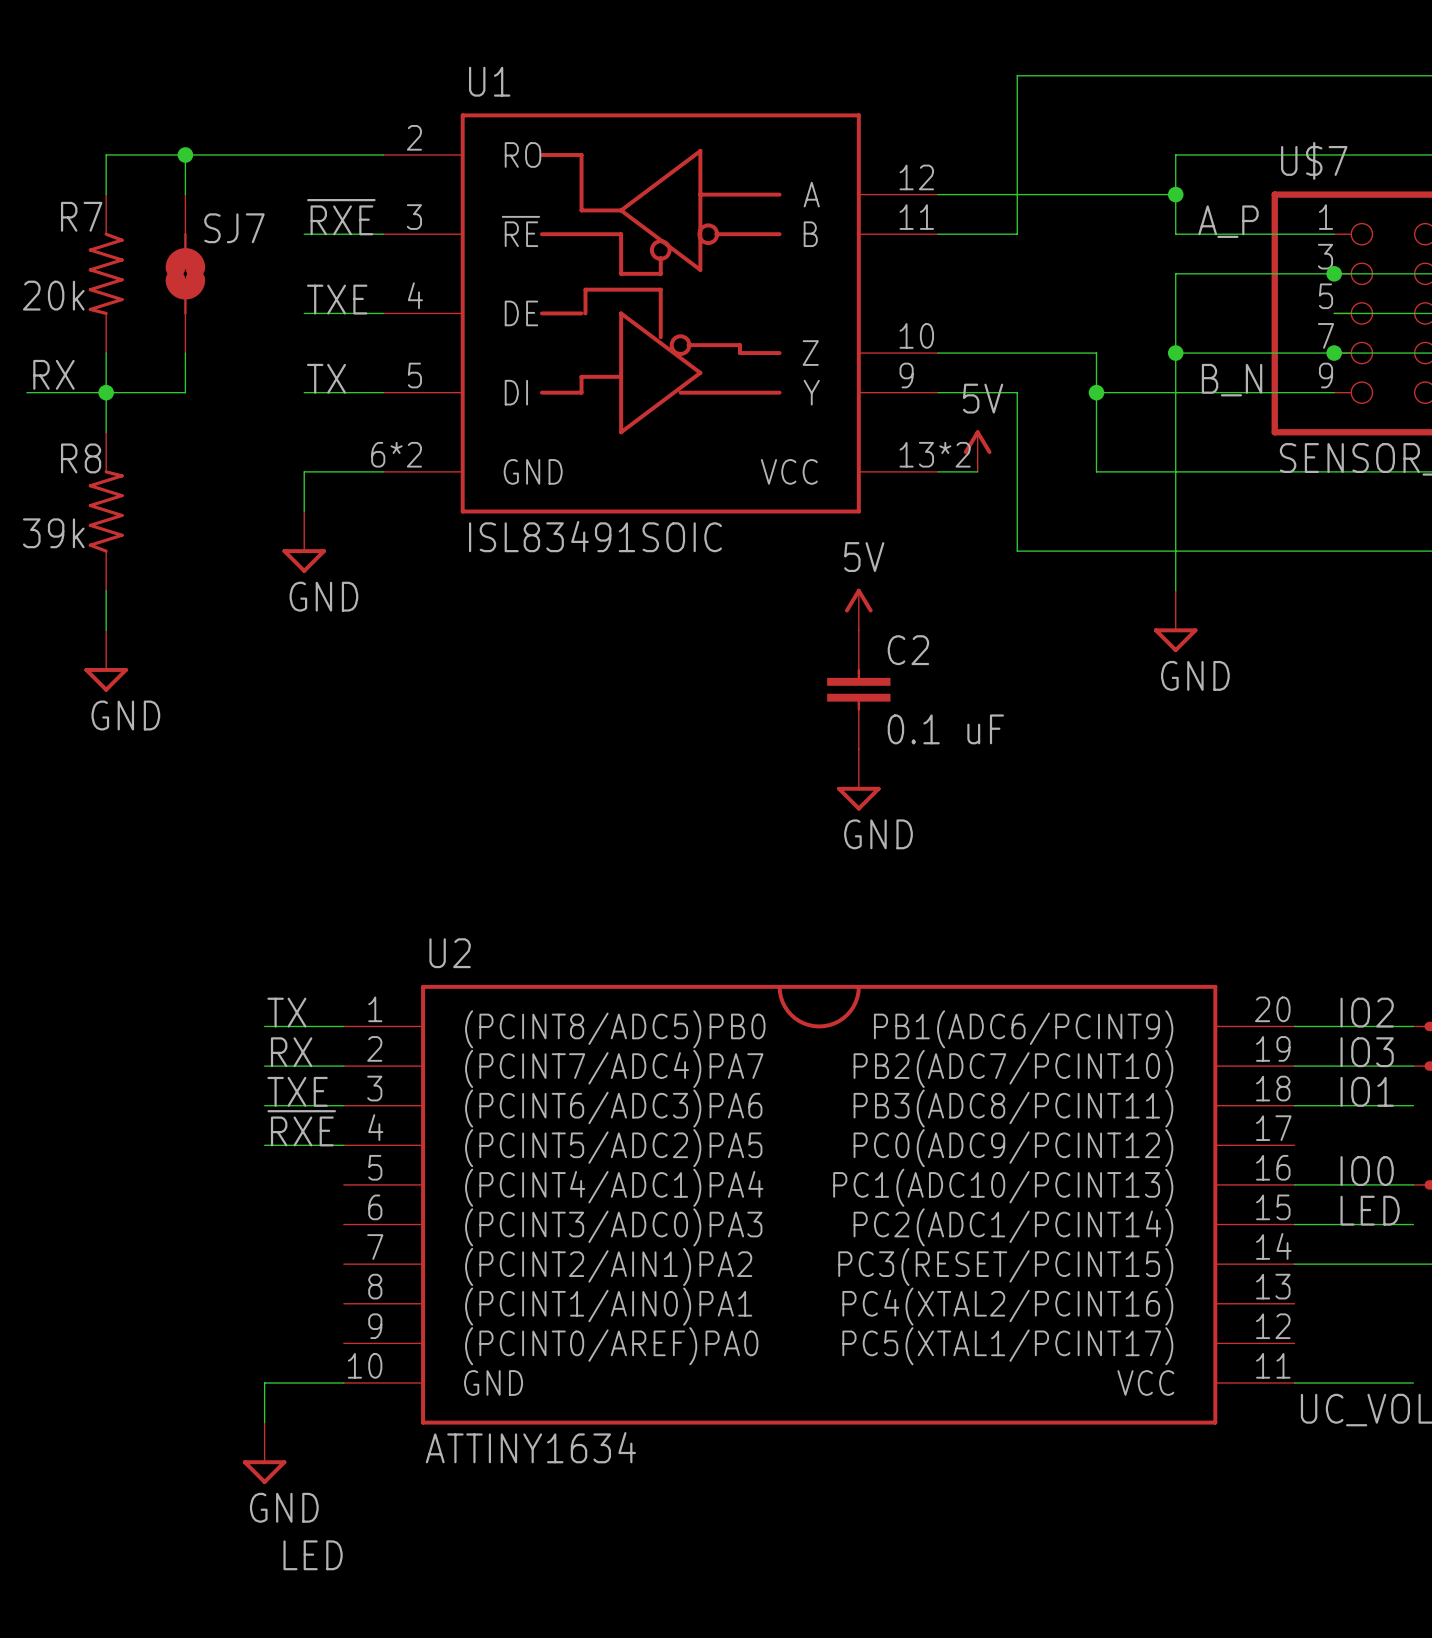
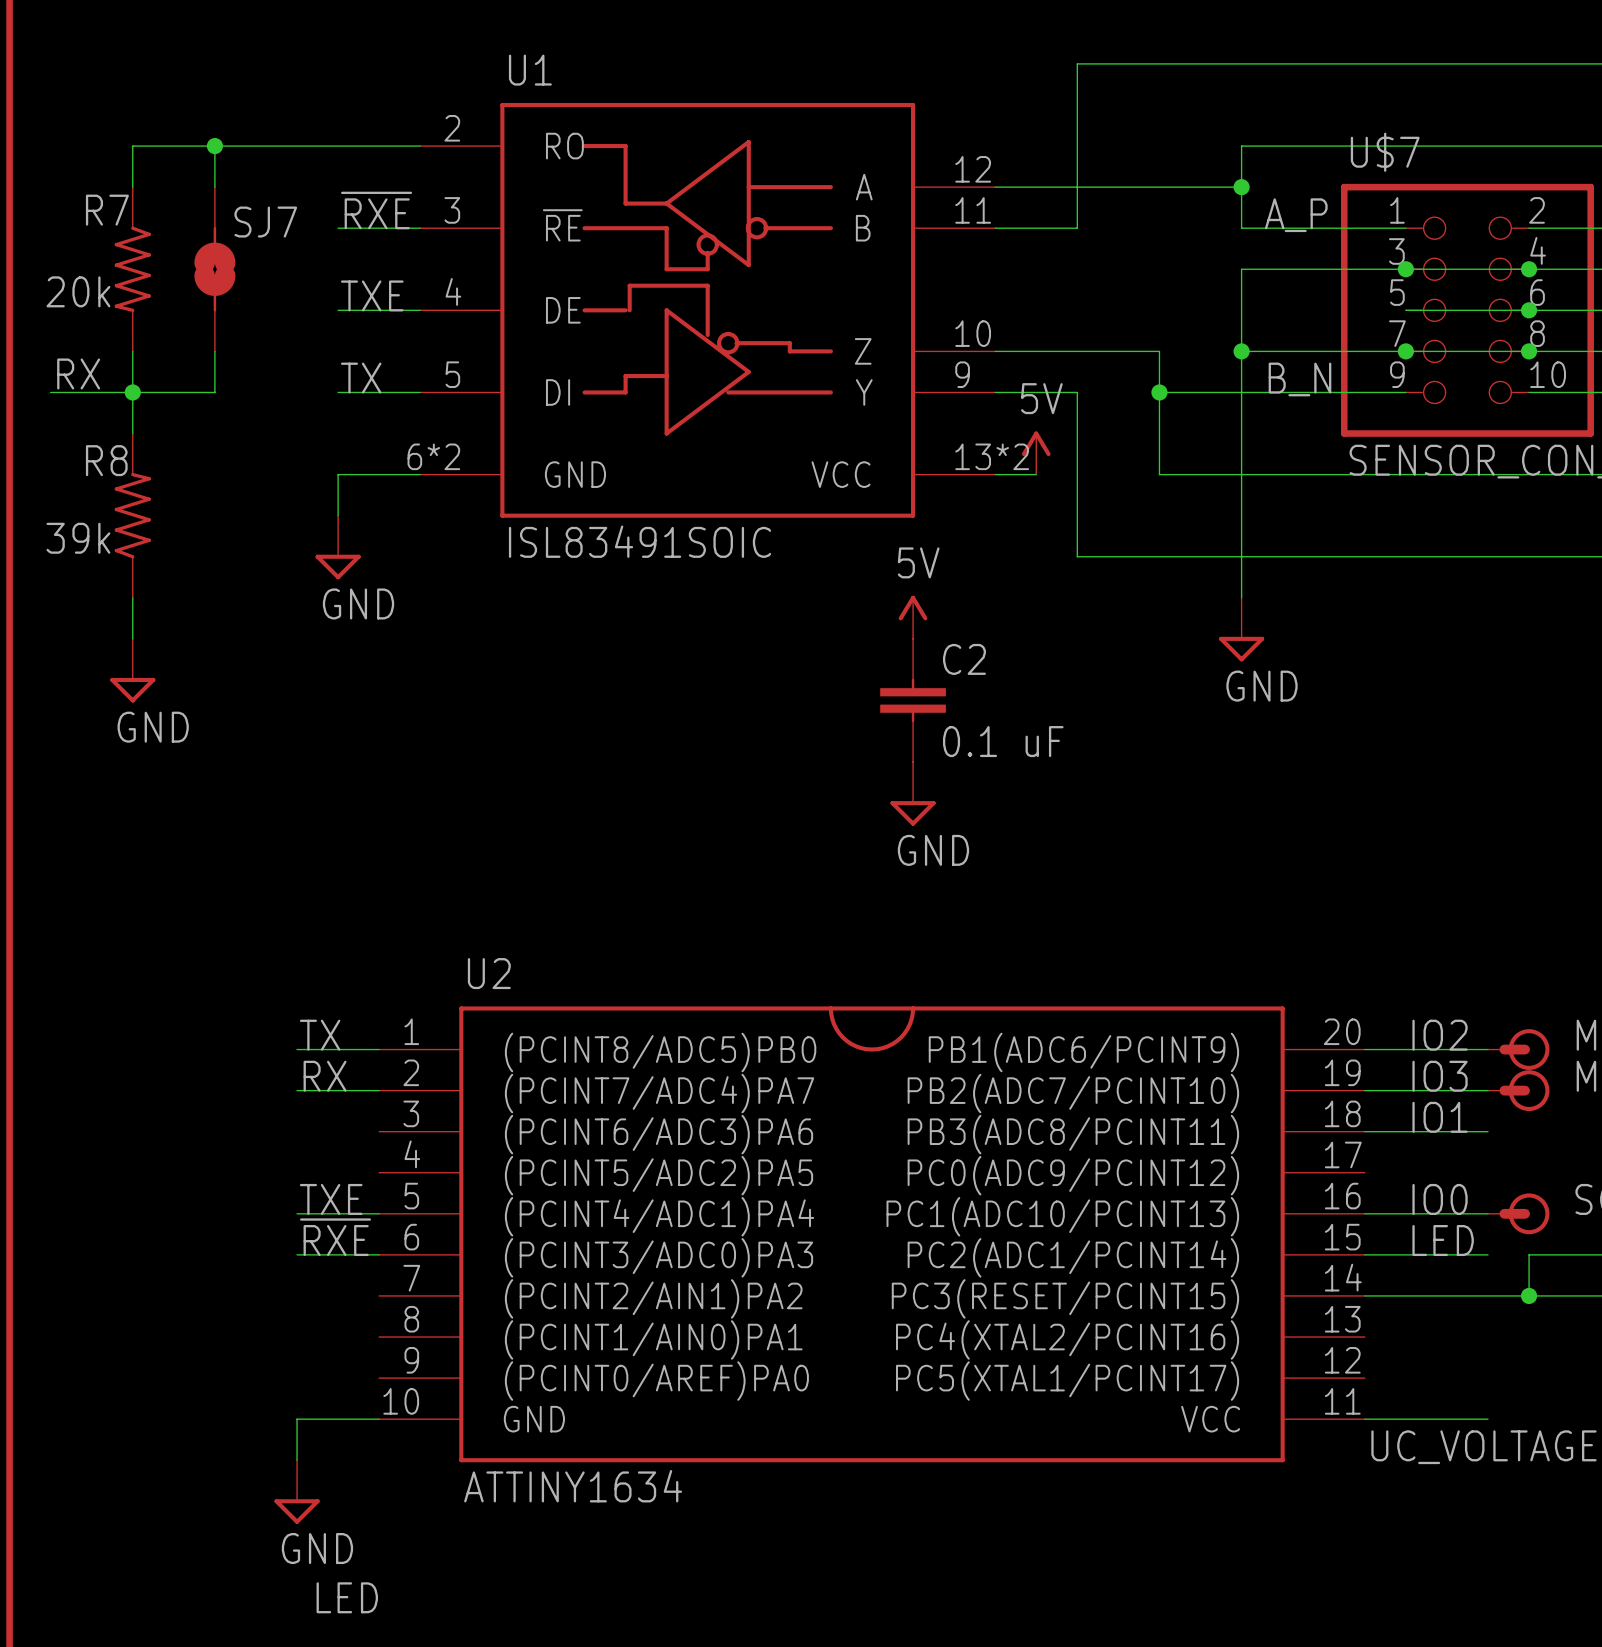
label position: TXE (297, 1091) -> TXE (331, 1199)
wire: (264, 1105) (343, 1105) -> (297, 1254) (379, 1254)
label position: ~{RXE} (301, 1128) -> ~{RXE} (335, 1237)
wire: (264, 1145) (343, 1145) -> (297, 1213) (379, 1213)

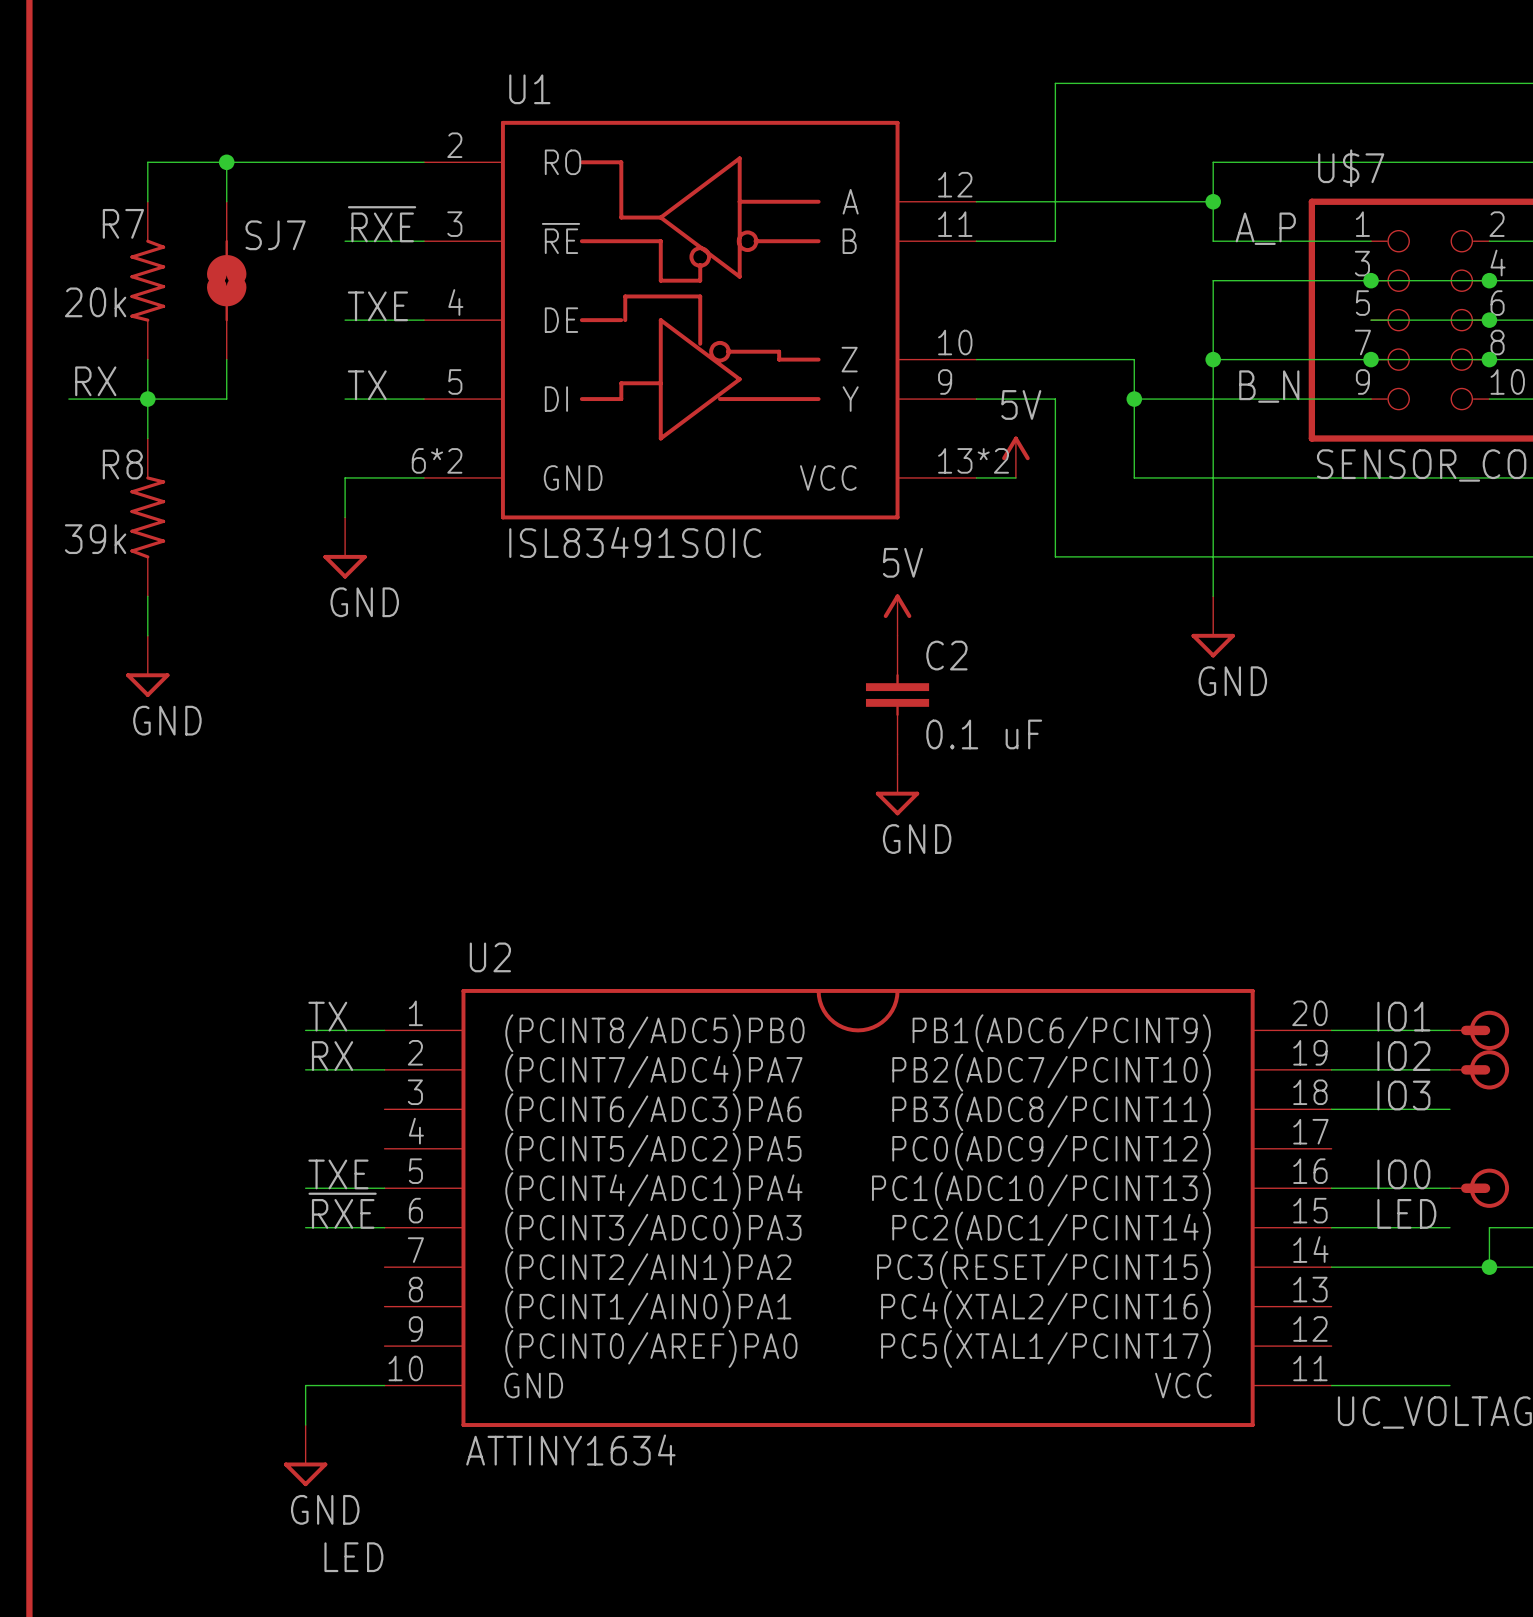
label: IO2 (1440, 1035) -> IO1 (1403, 1016)
label: IO3 (1440, 1076) -> IO2 (1403, 1056)
label: IO1 (1440, 1117) -> IO3 (1403, 1095)

